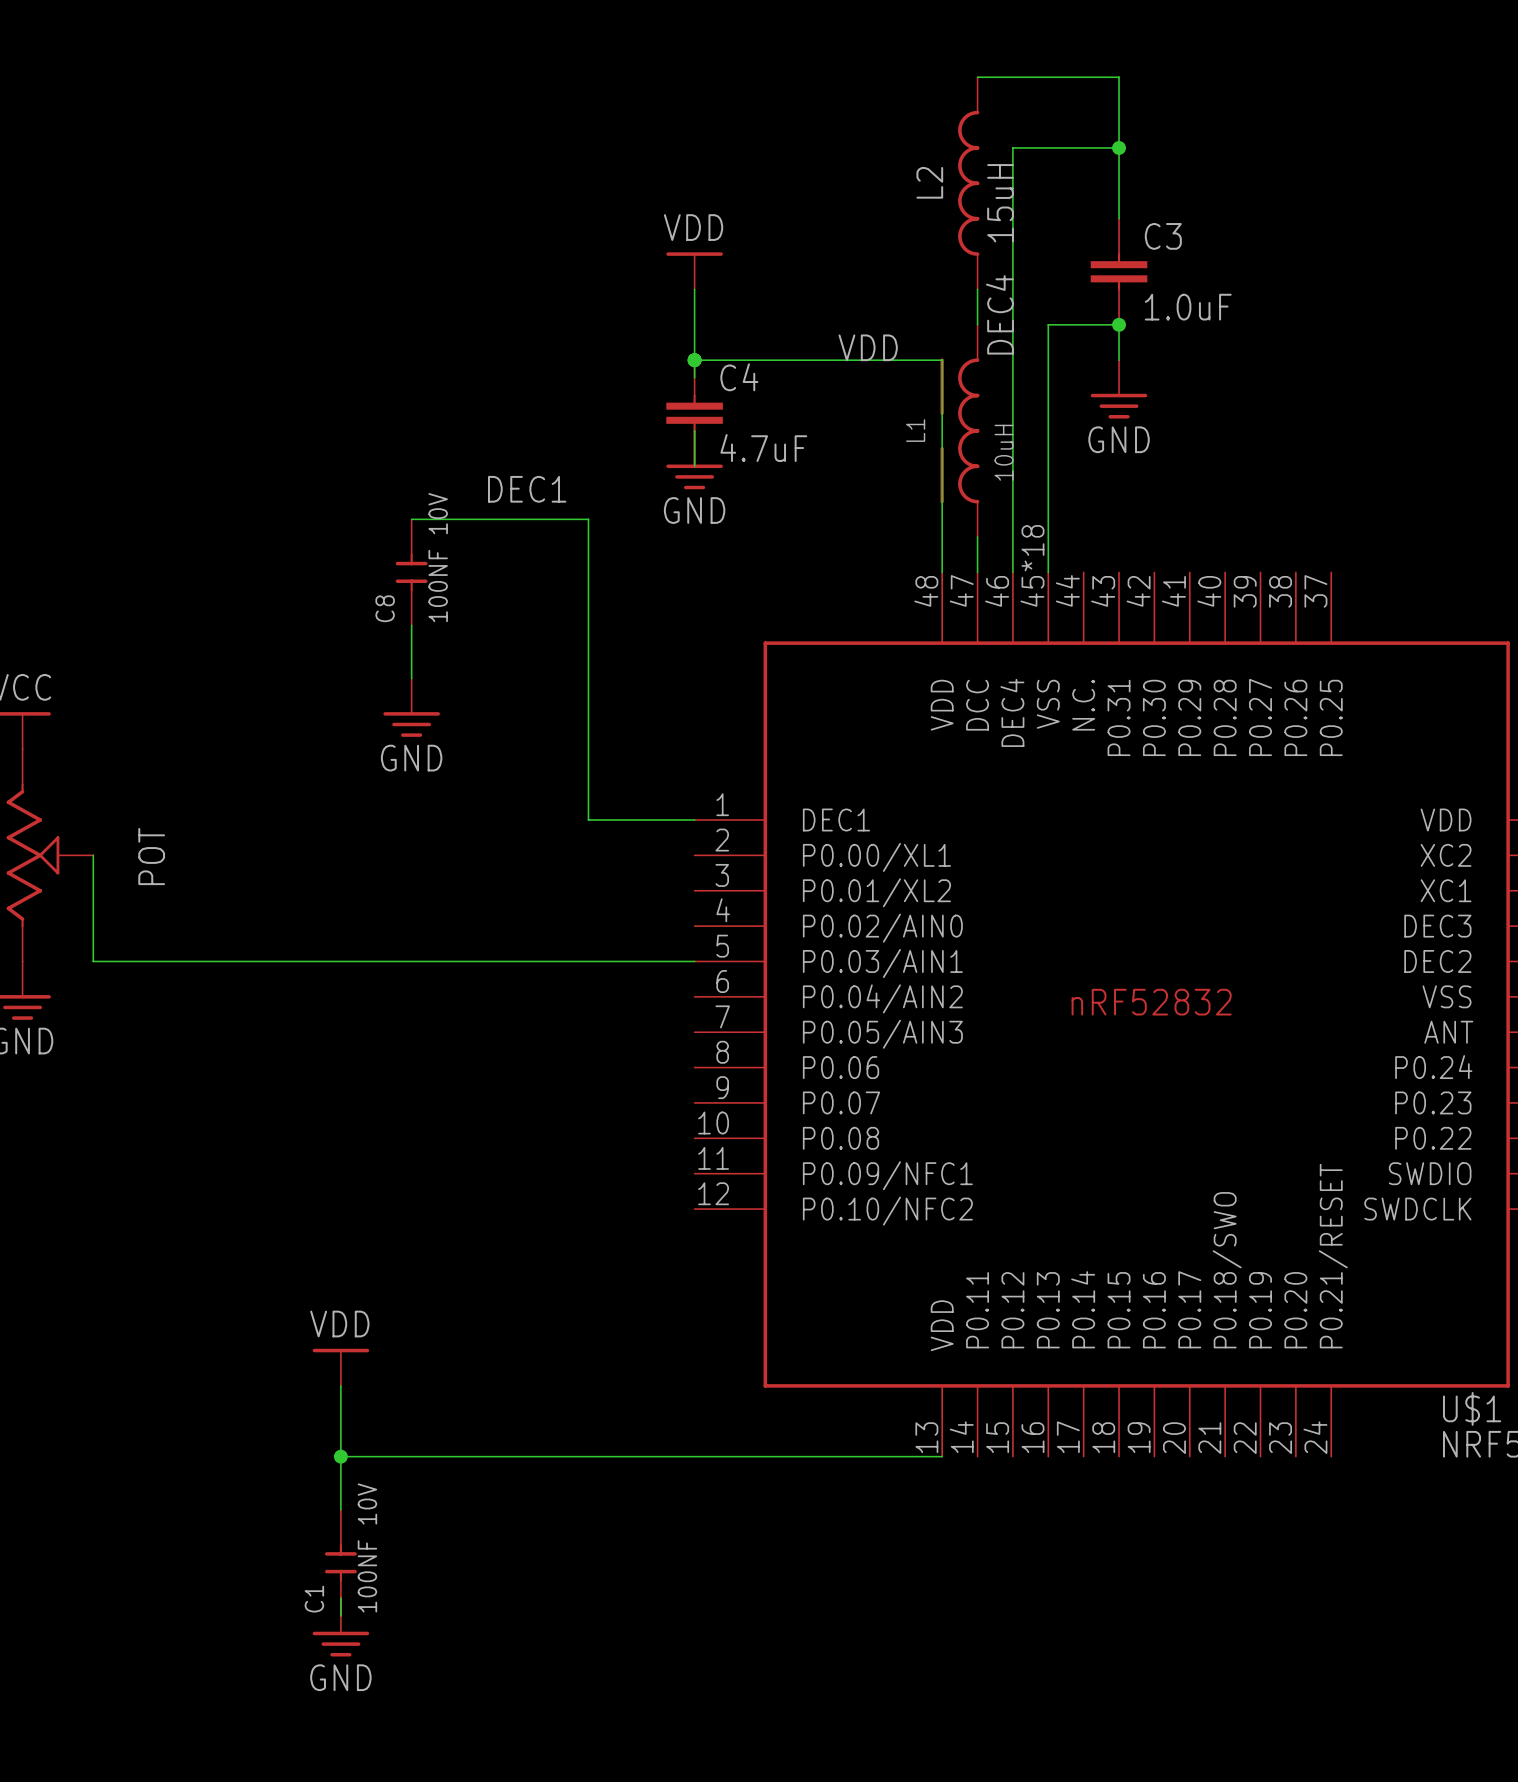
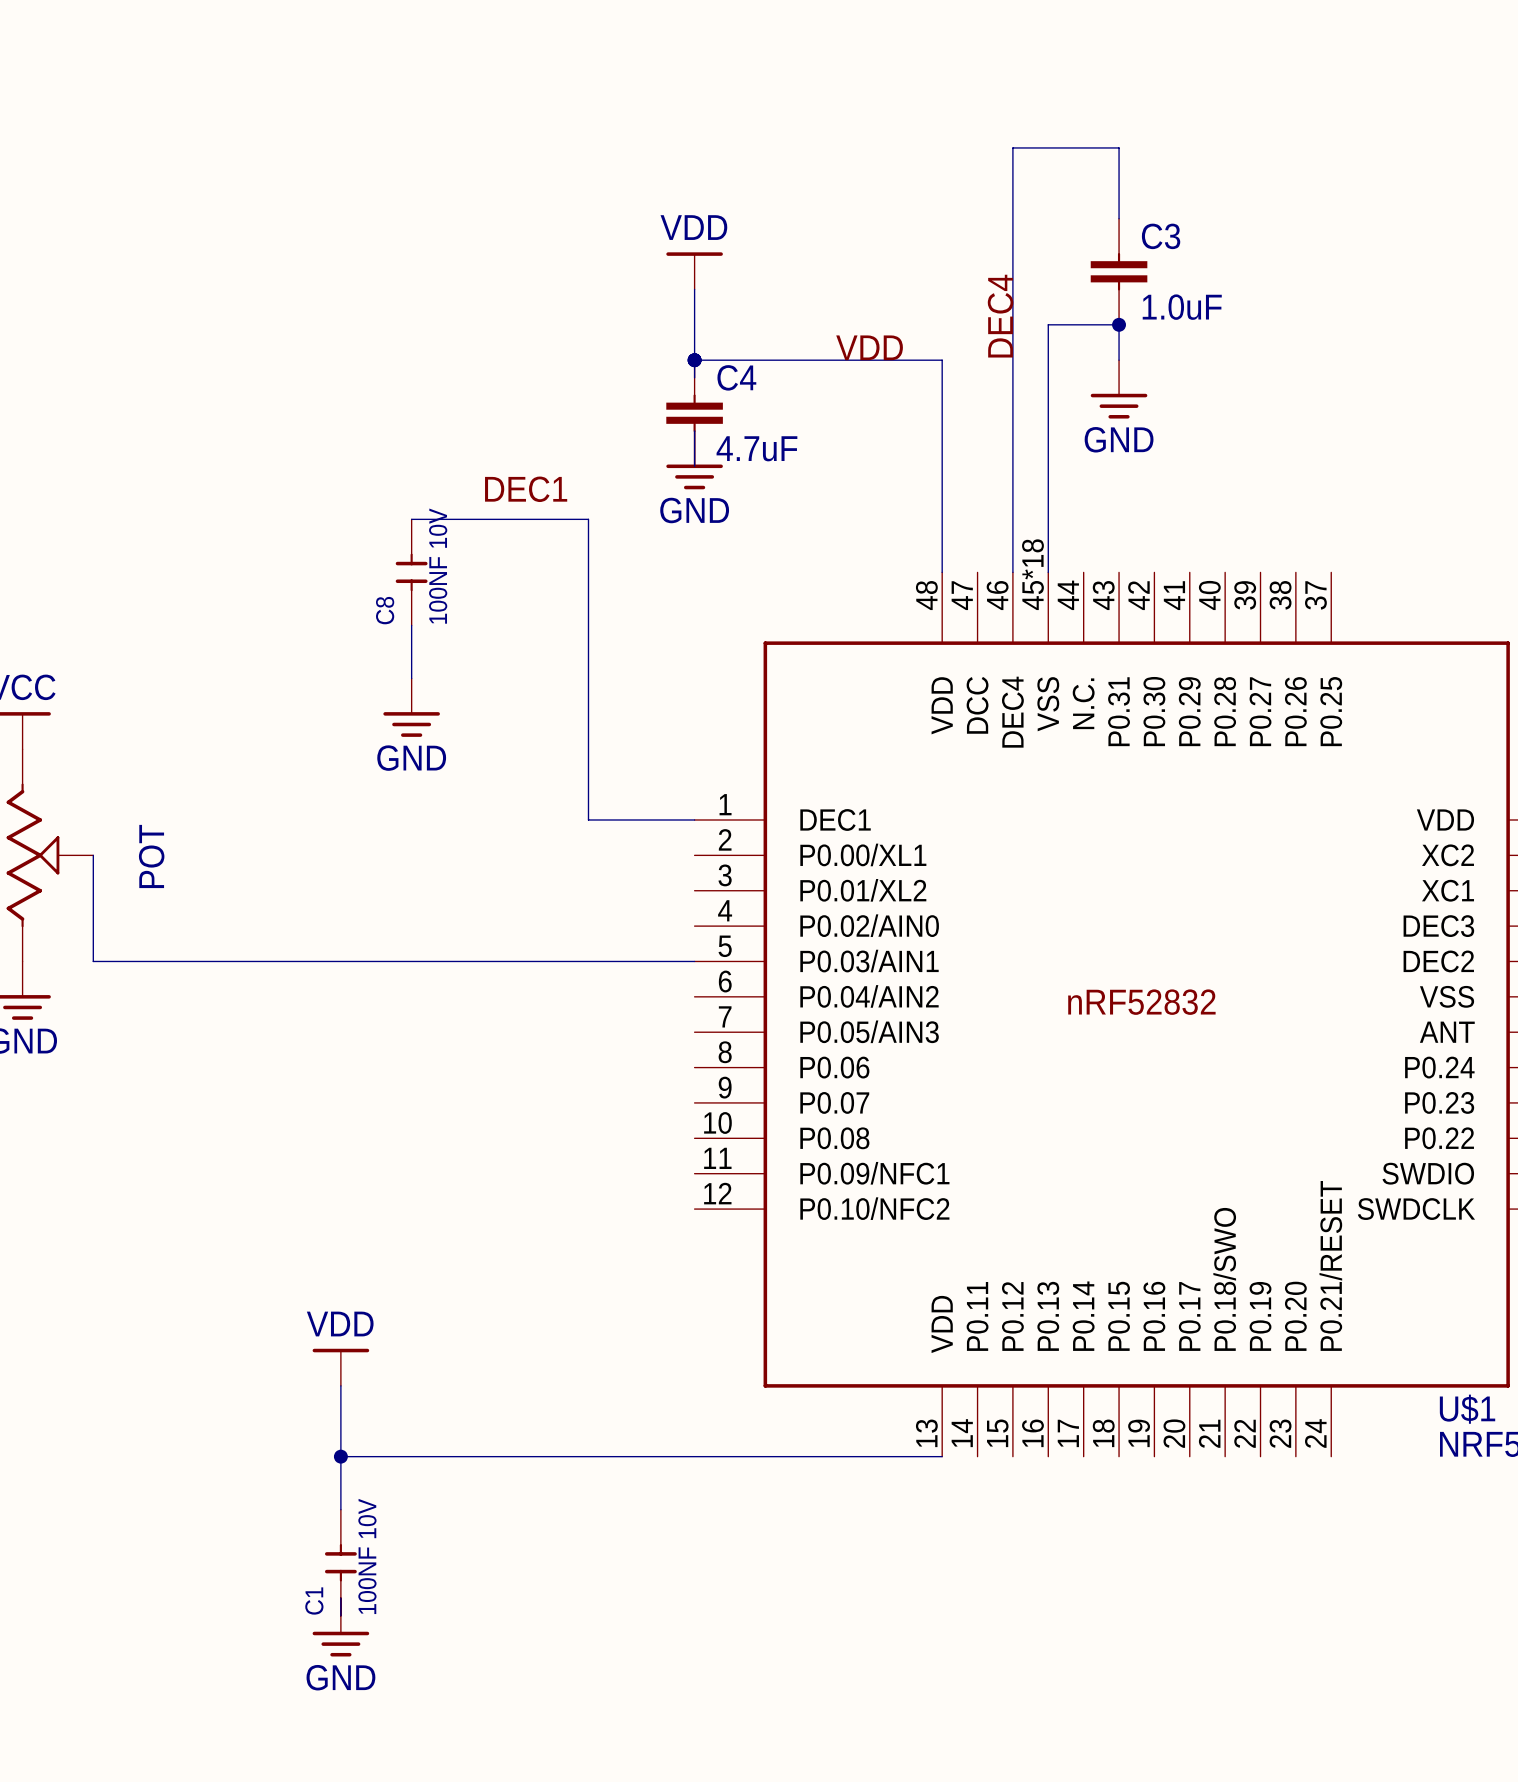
wire: (977, 77) (1119, 77) (1119, 147) -> none
junction: (1119, 147) -> none
L2: 15uH (968, 183) -> none
wire: (977, 289) (977, 324) -> none
L1: 10uH (959, 430) -> none
wire: (977, 537) (977, 572) -> none

